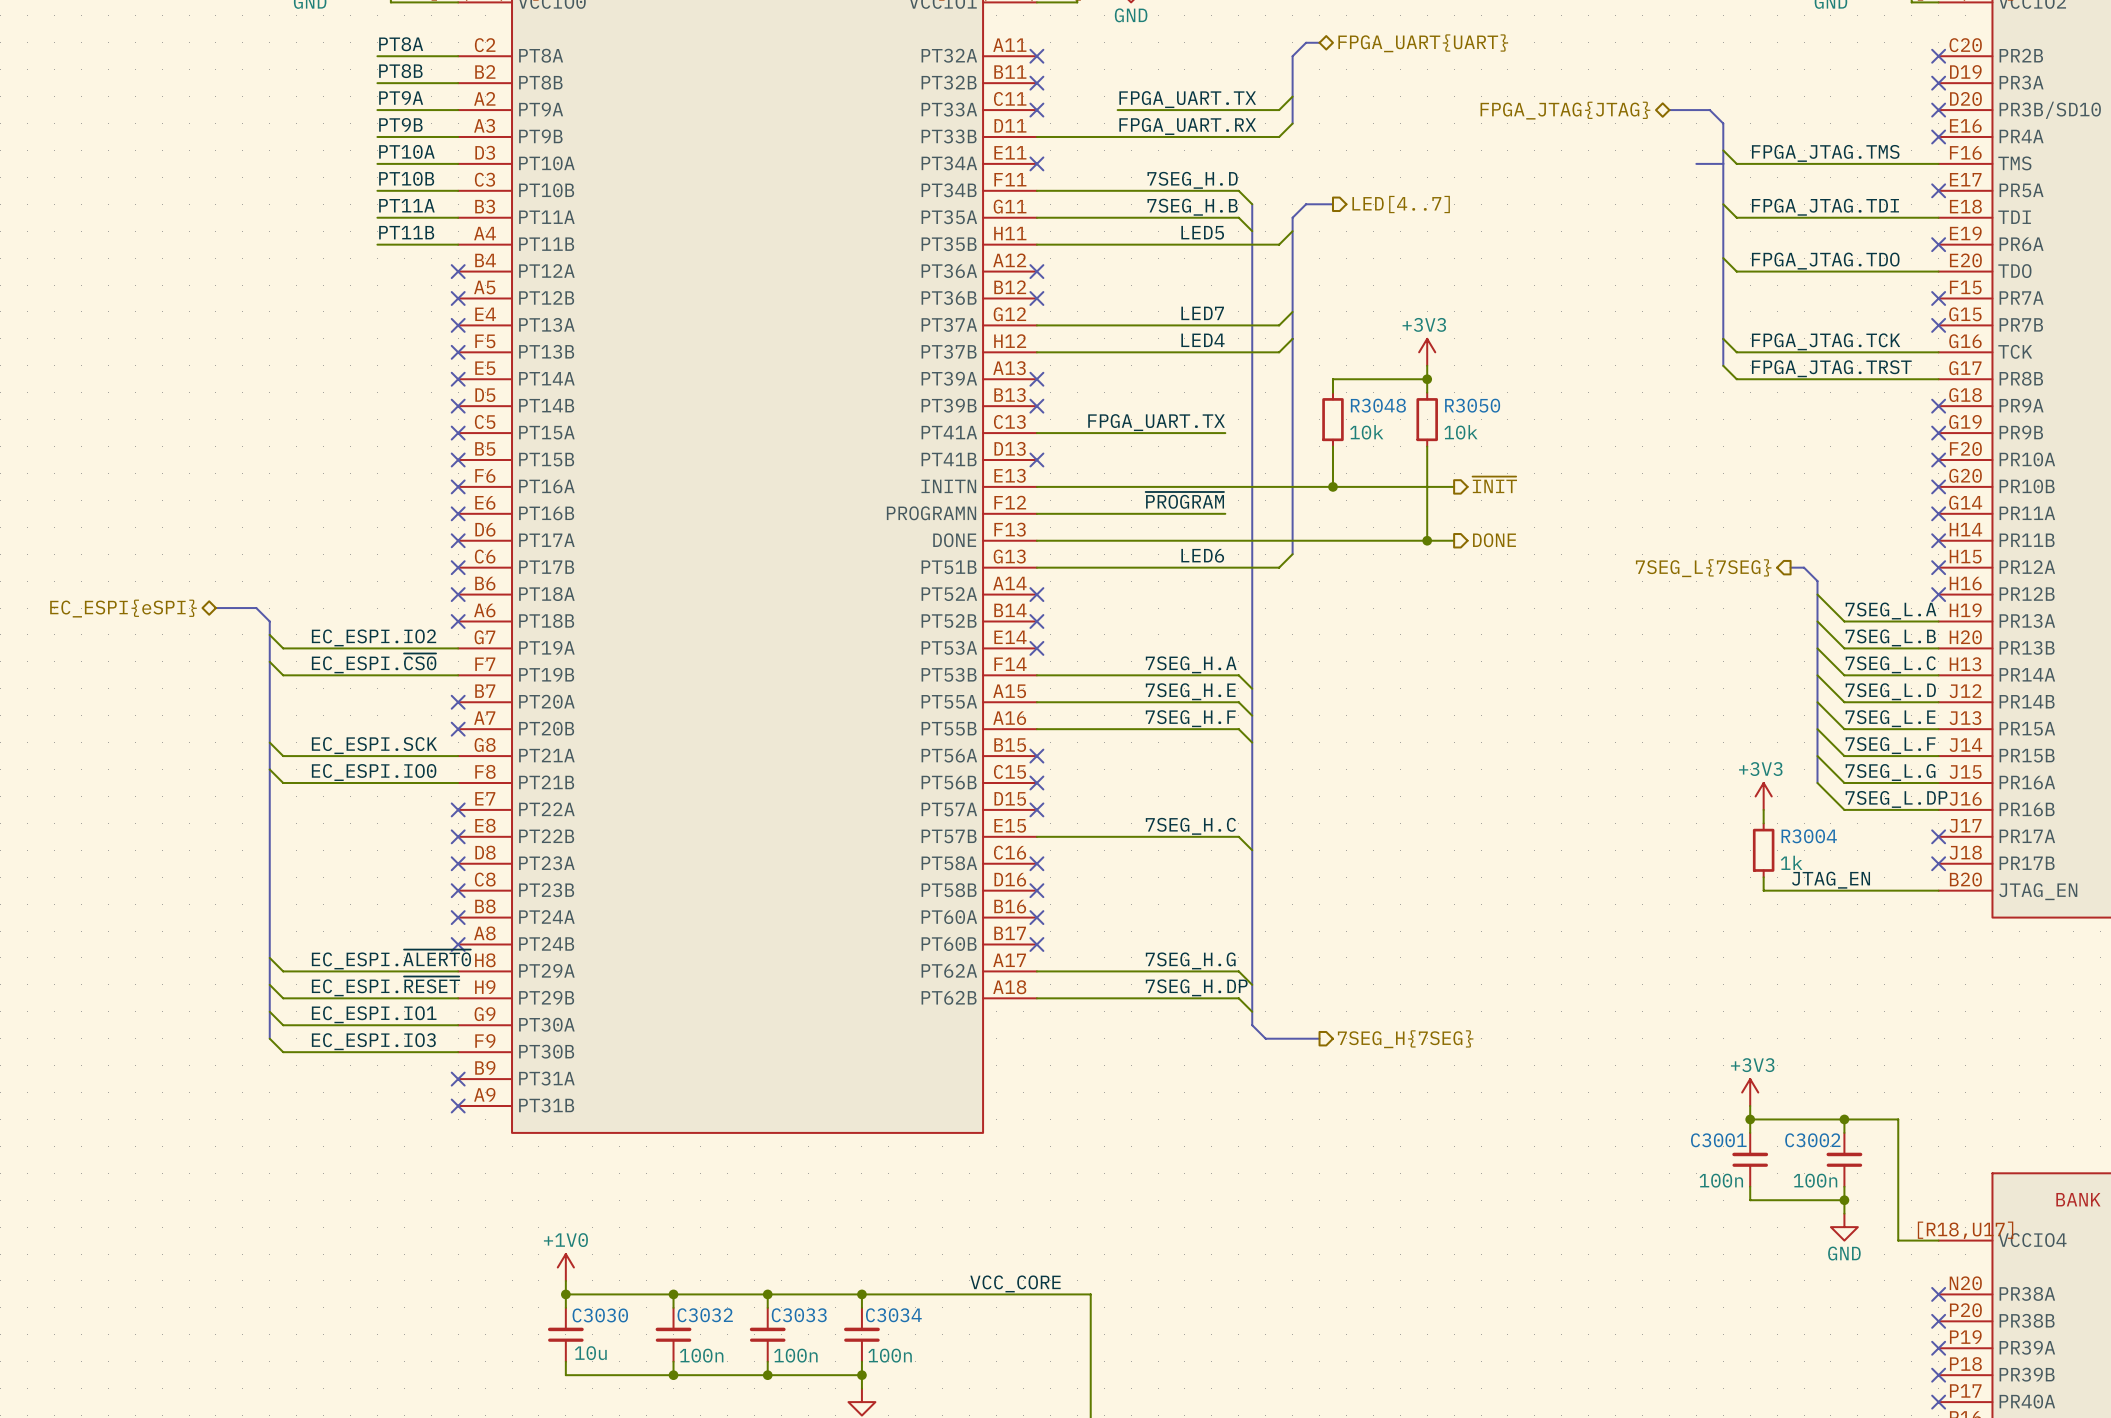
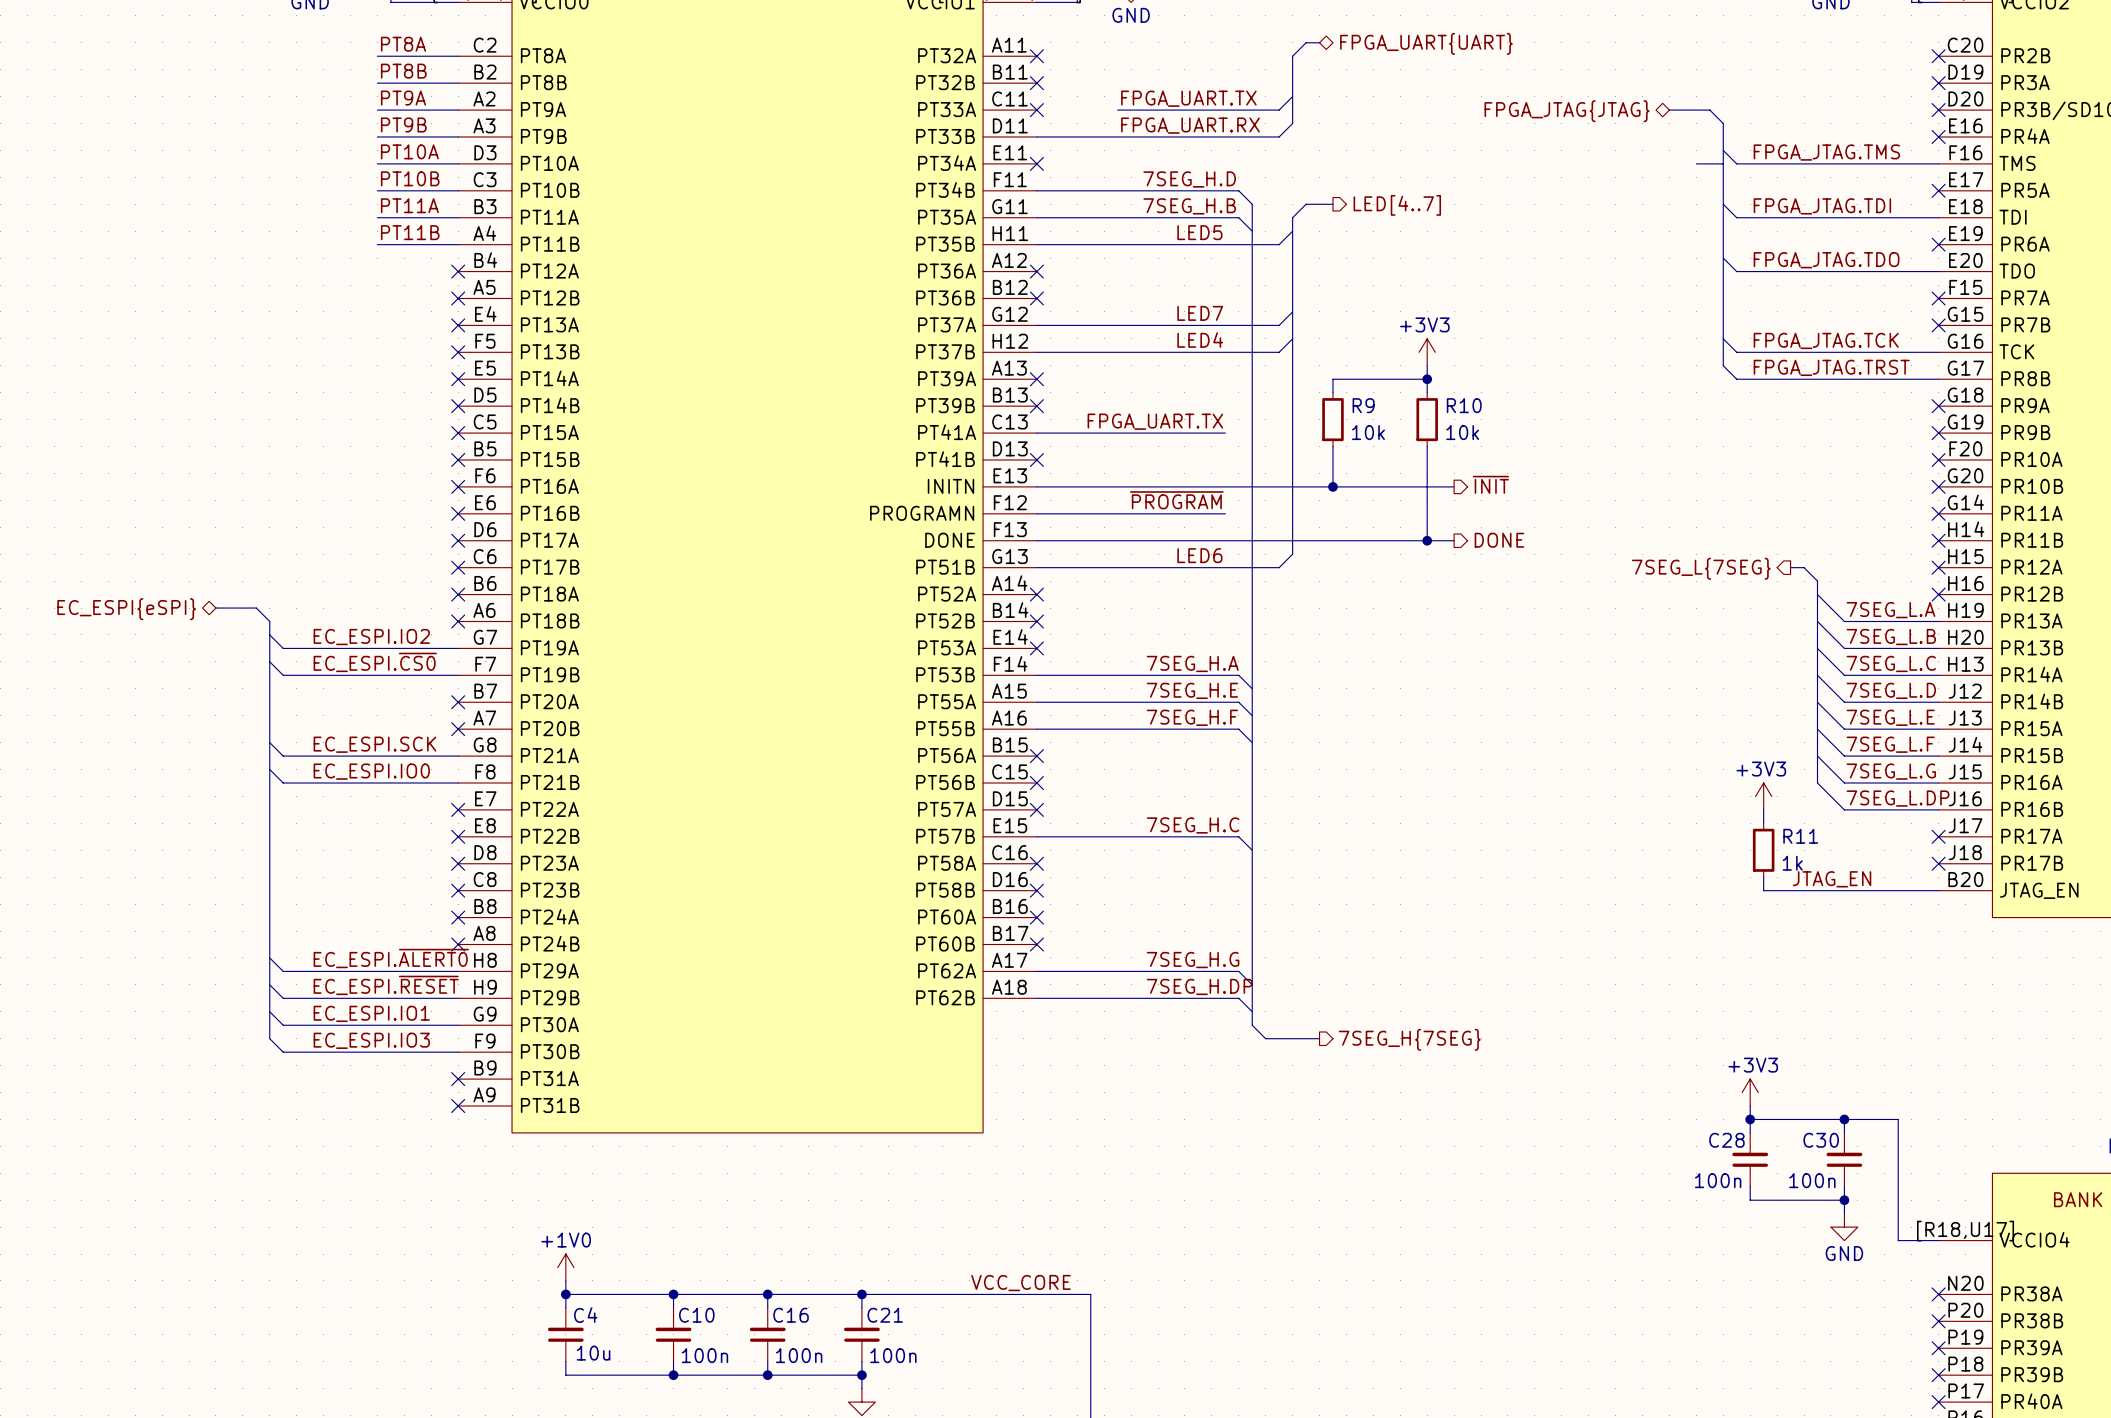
R3048 name: R3048 (1378, 405) -> R9 (1363, 405)
R3050 name: R3050 (1472, 405) -> R10 (1464, 405)
R3004 name: R3004 (1809, 836) -> R11 (1800, 836)
C3001 name: C3001 (1718, 1140) -> C28 (1726, 1140)
C3002 name: C3002 (1812, 1140) -> C30 (1821, 1140)
C3030 name: C3030 (600, 1315) -> C4 (585, 1315)
C3032 name: C3032 (705, 1315) -> C10 (696, 1315)
C3033 name: C3033 (799, 1315) -> C16 (791, 1315)
C3034 name: C3034 (893, 1315) -> C21 (885, 1315)

